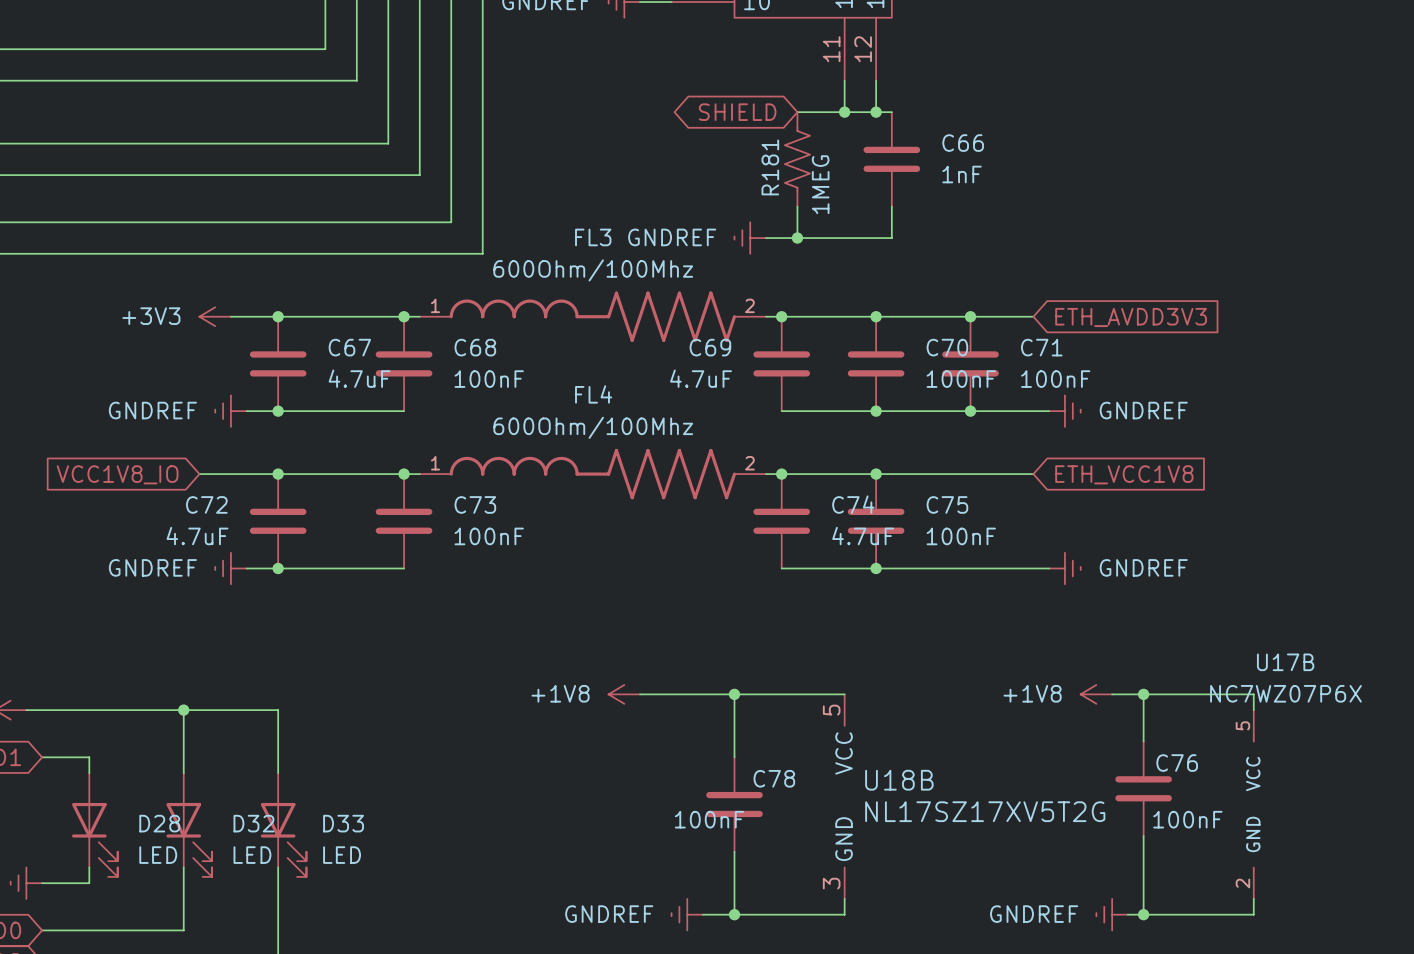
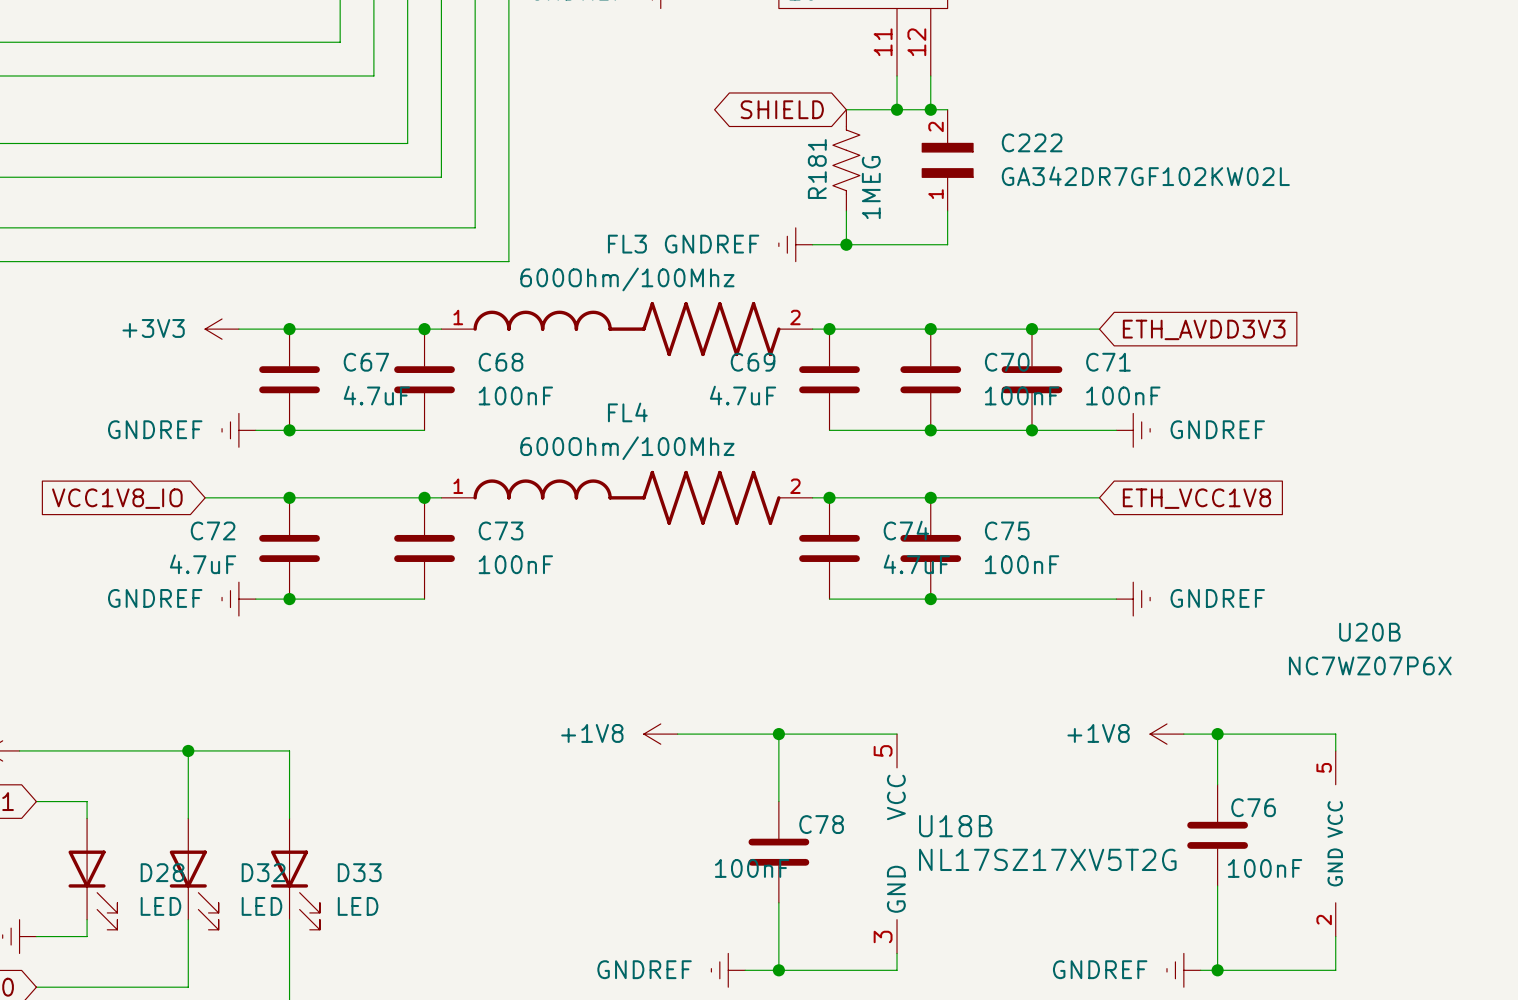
C66: 1nF (891, 159) -> none
C222: none -> GA342DR7GF102KW02L (947, 160)
U20B: none -> NC7WZ07P6X (1335, 843)
U17B: NC7WZ07P6X (1253, 804) -> none

